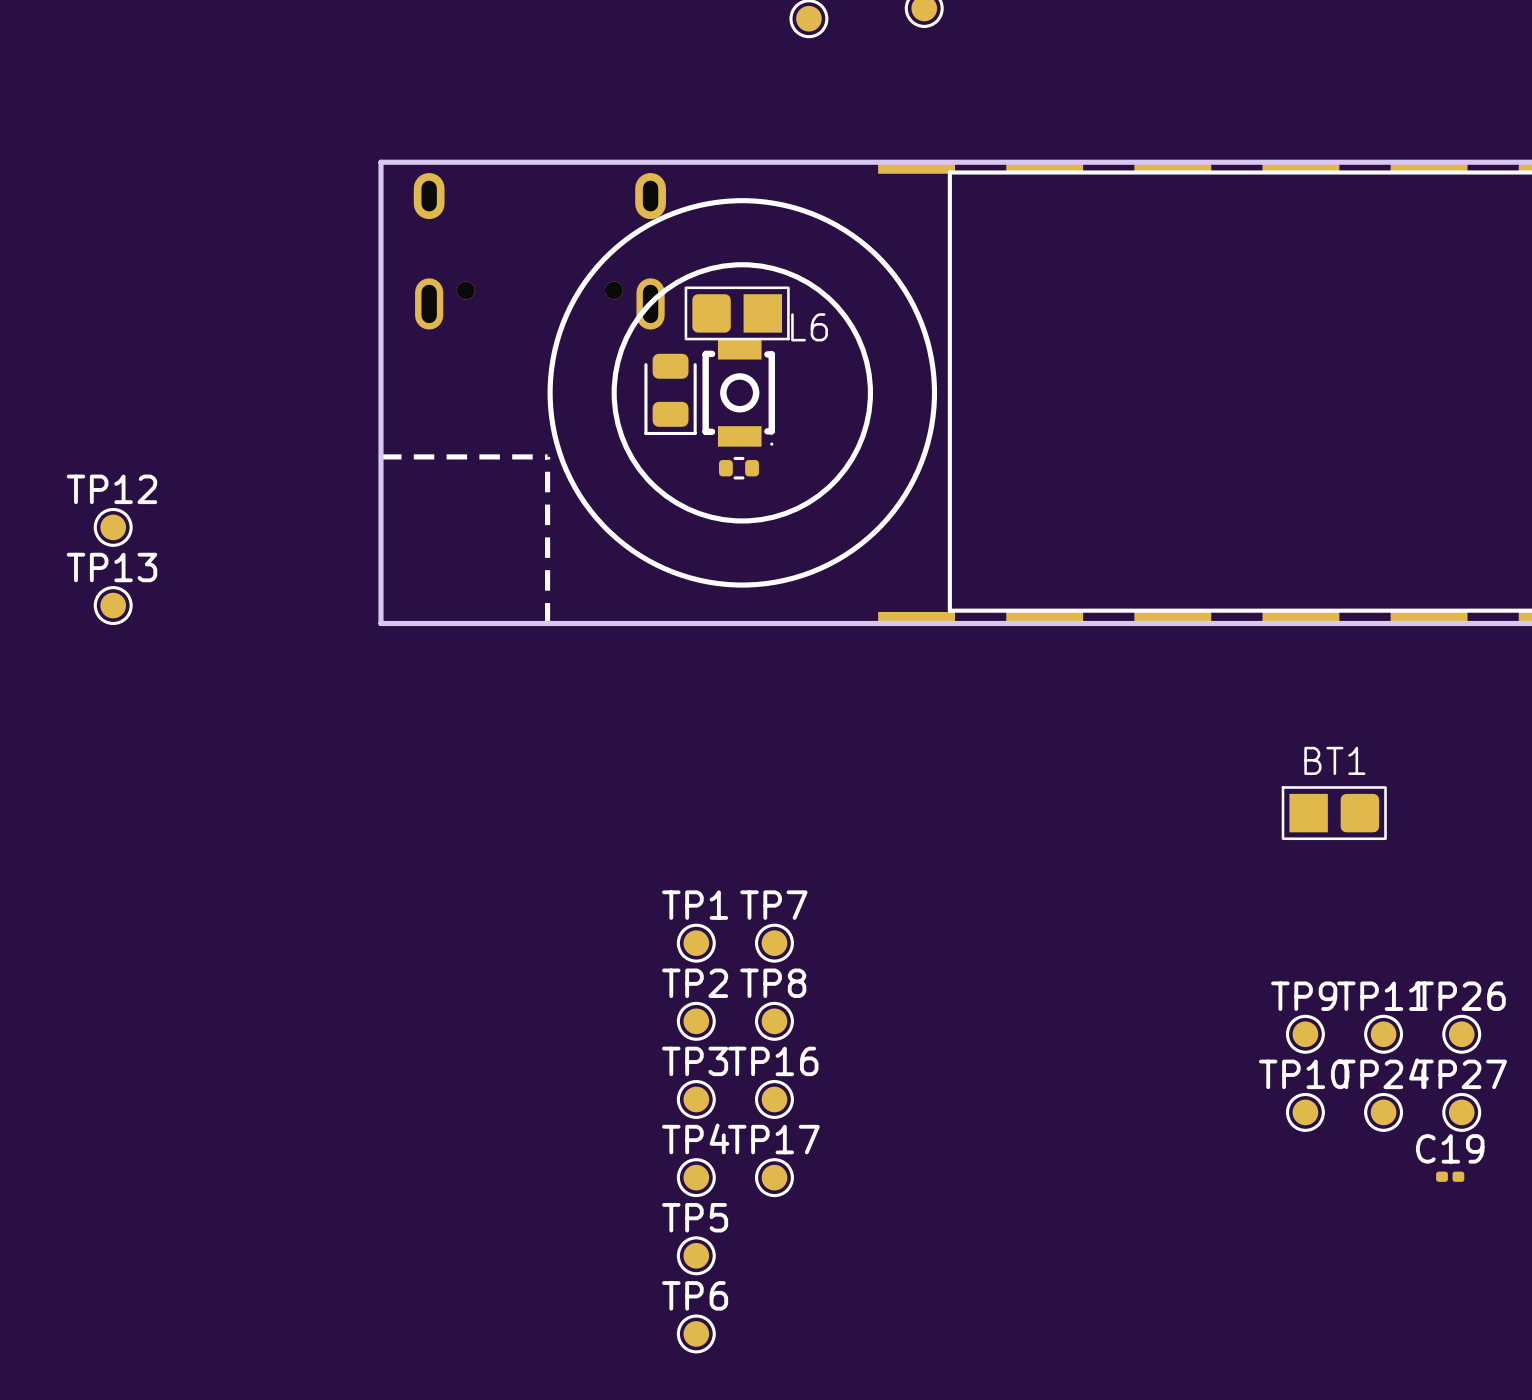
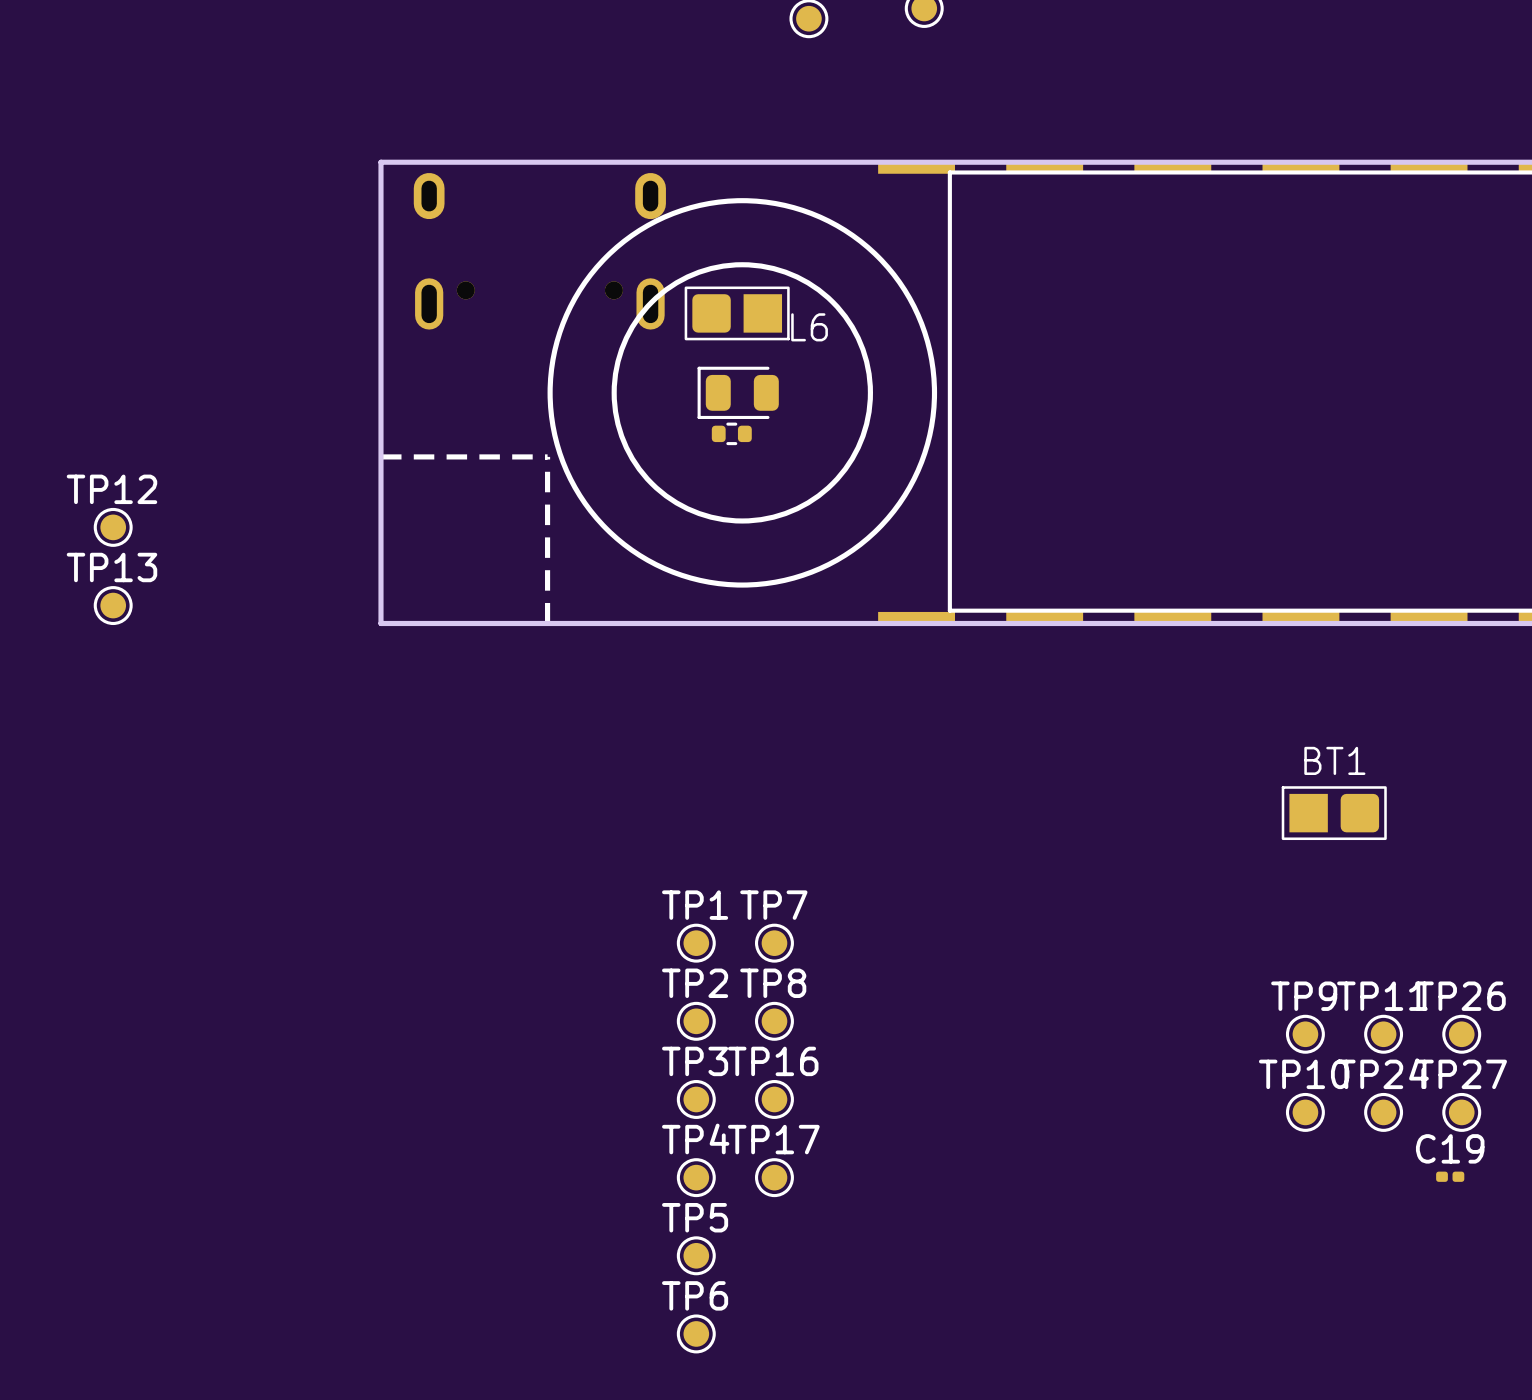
part footprint: [702, 339, 775, 447] -> [697, 366, 779, 420]
part: (670, 394) -> none
part position: (738, 468) -> (731, 433)

